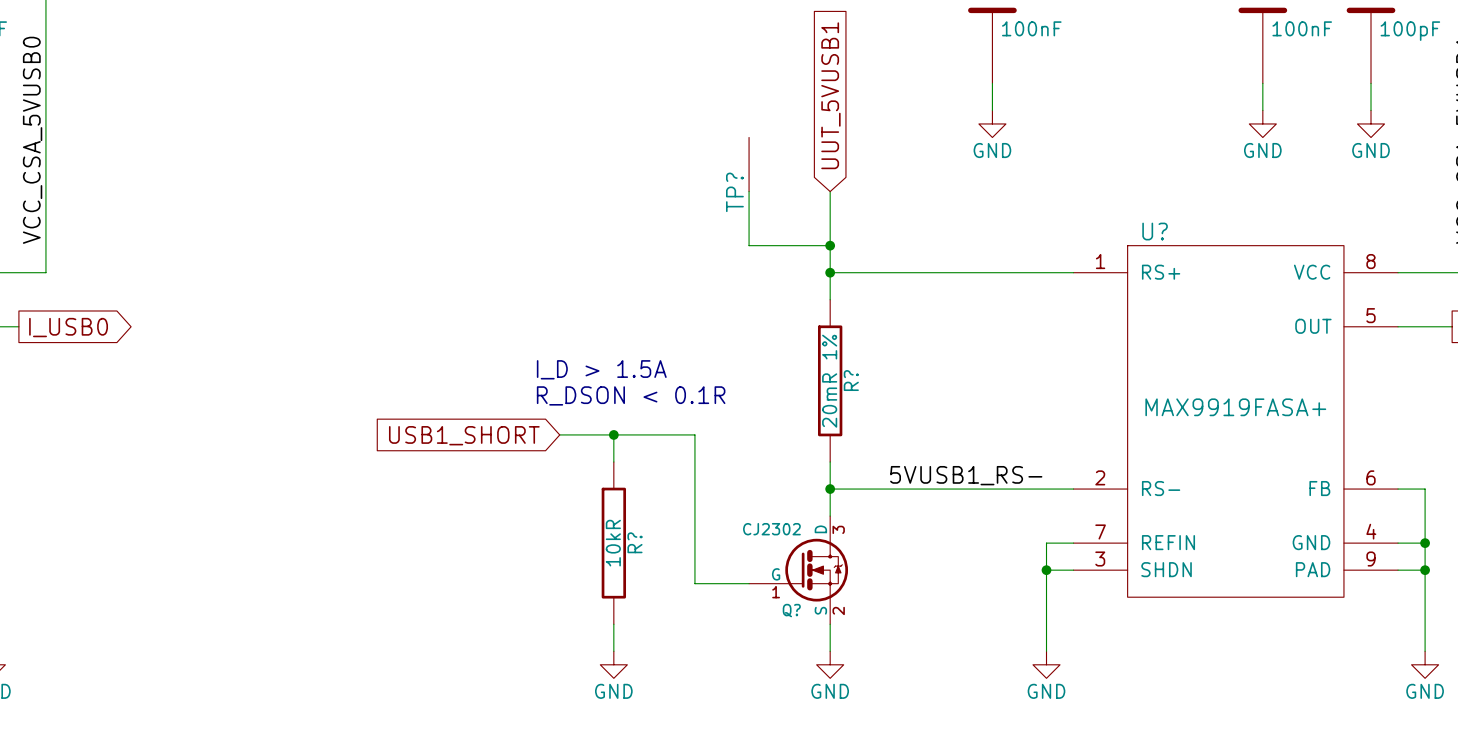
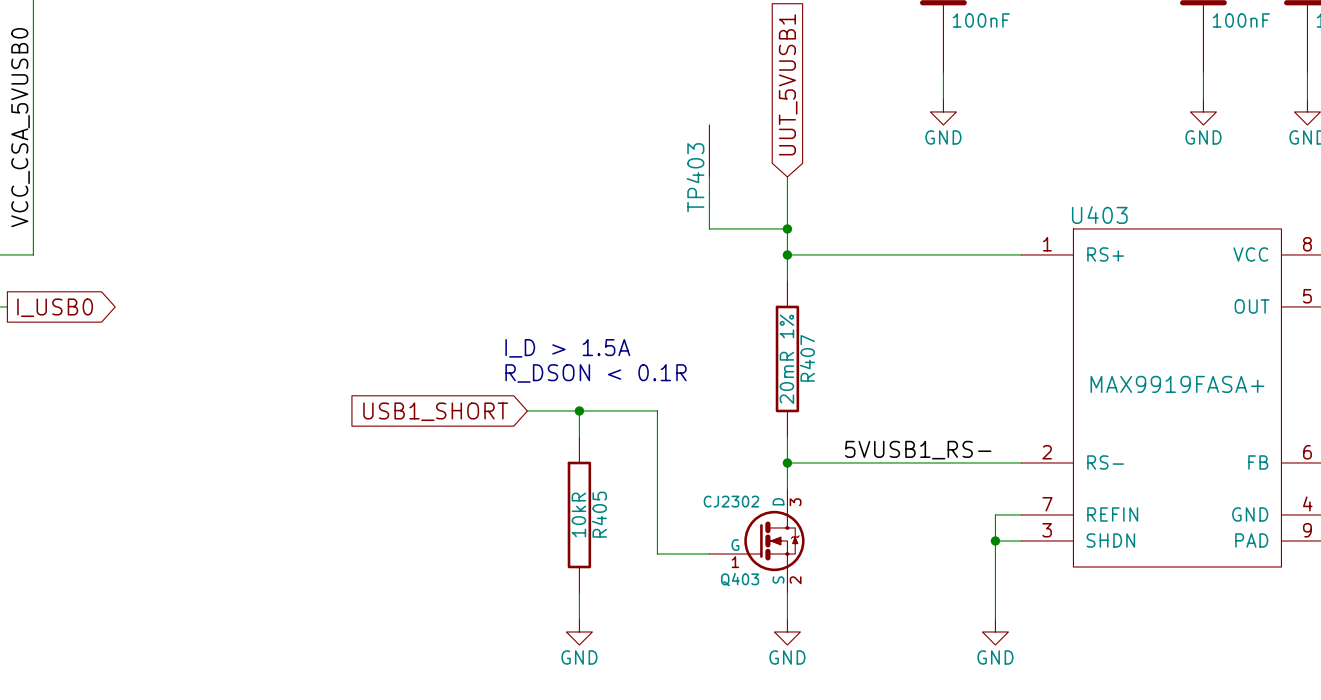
TP? name: TP? (734, 192) -> TP403 (695, 177)
U? name: U? (1155, 231) -> U403 (1099, 215)
R? name: R? (851, 380) -> R407 (807, 358)
R? name: R? (634, 542) -> R405 (599, 514)
Q? name: Q? (791, 610) -> Q403 (740, 579)

